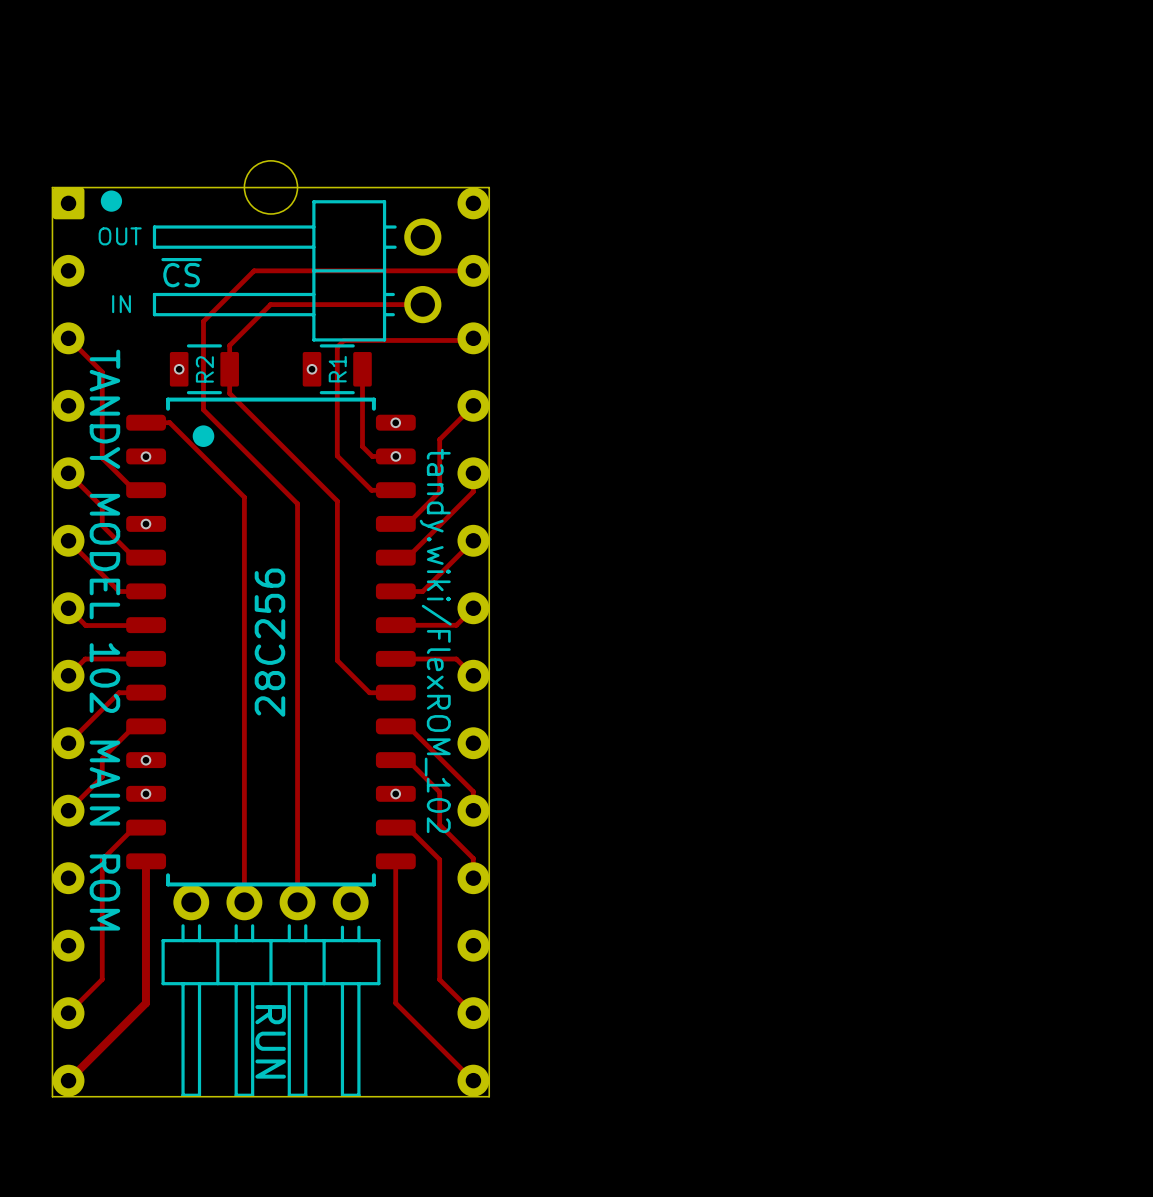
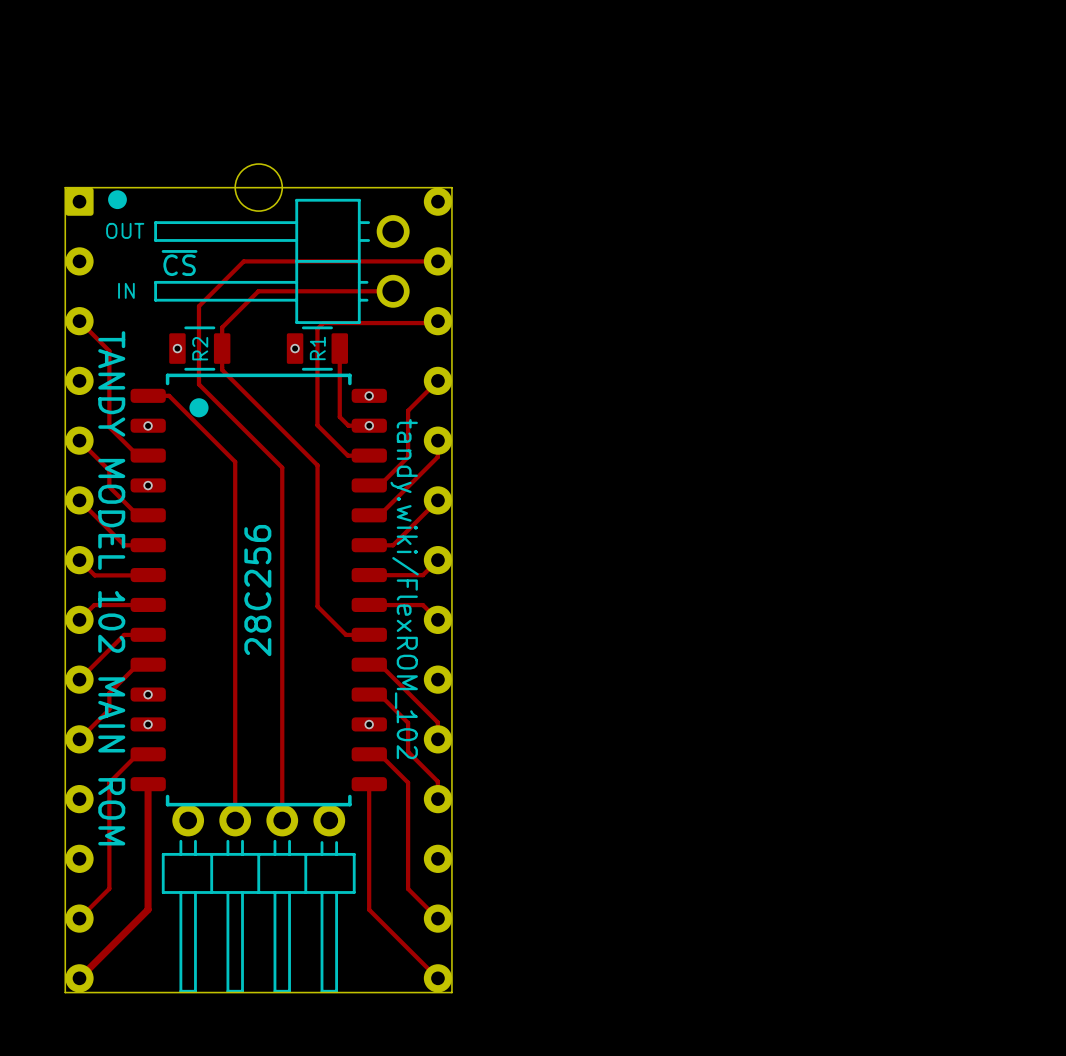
text: RUN (270, 1041) -> none

